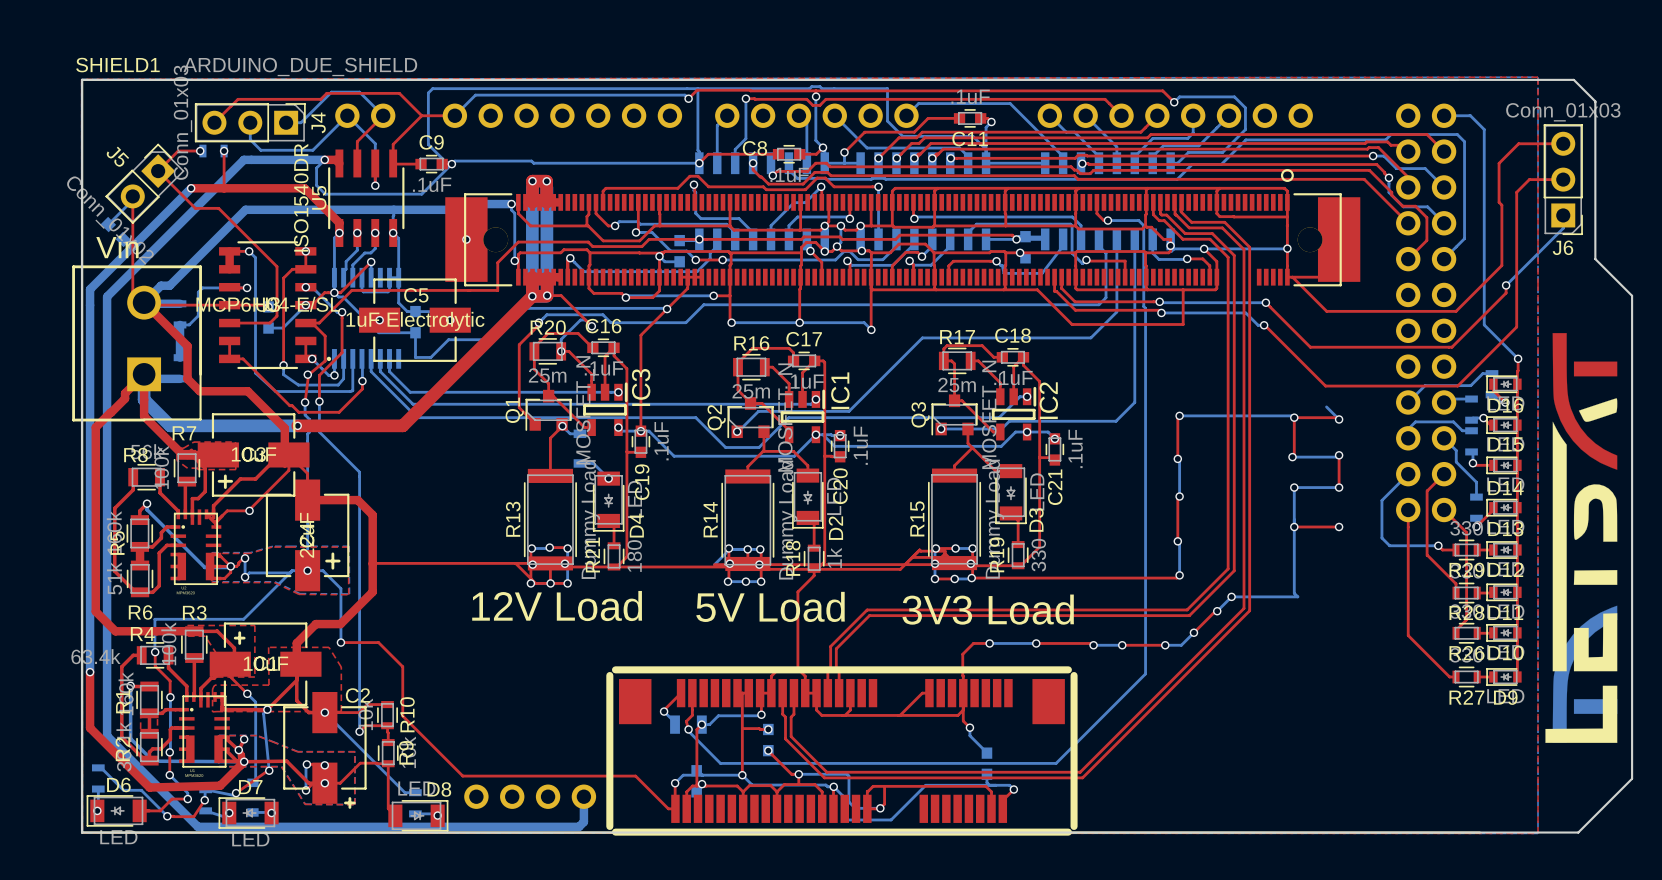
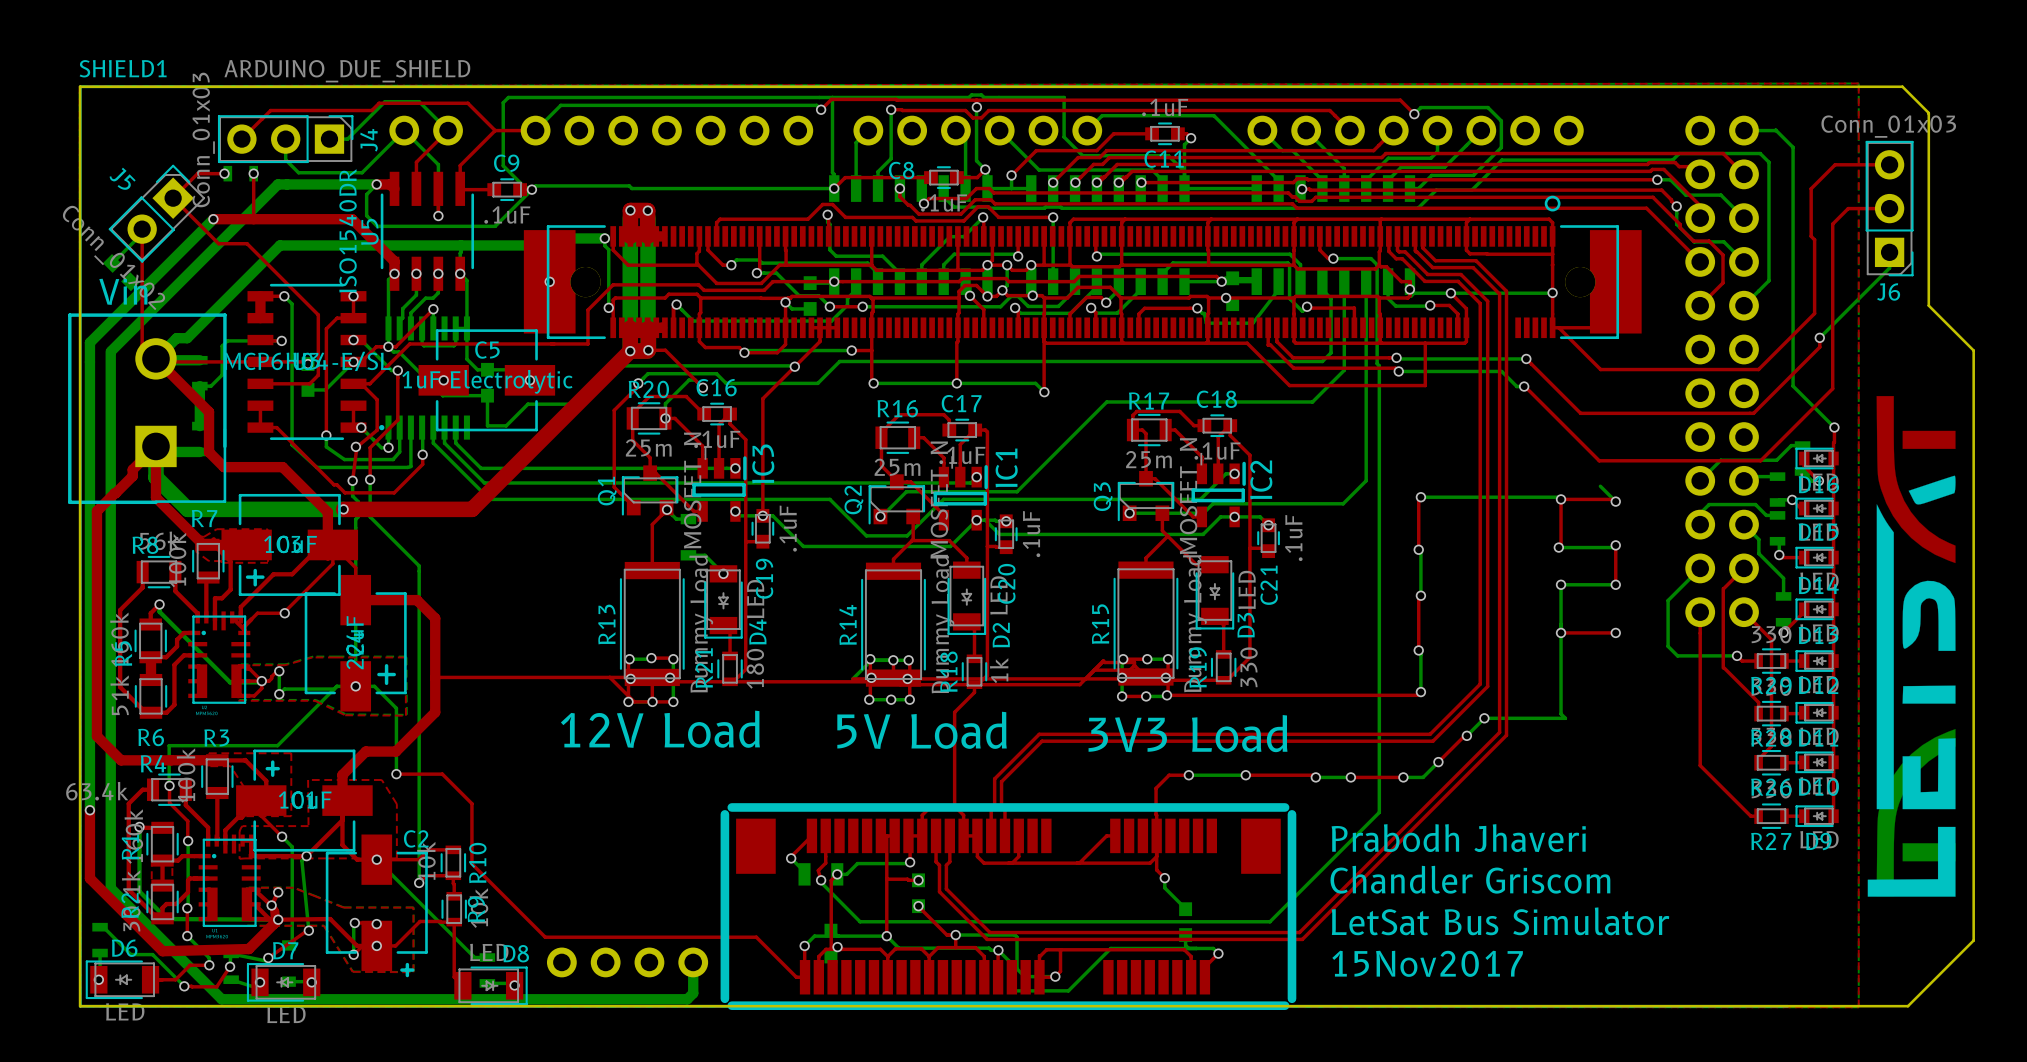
text: none -> Prabodh Jhaveri (1458, 838)
text: none -> Chandler Griscom (1470, 879)
text: none -> LetSat Bus Simulator (1500, 921)
text: none -> 15Nov2017 (1427, 963)

